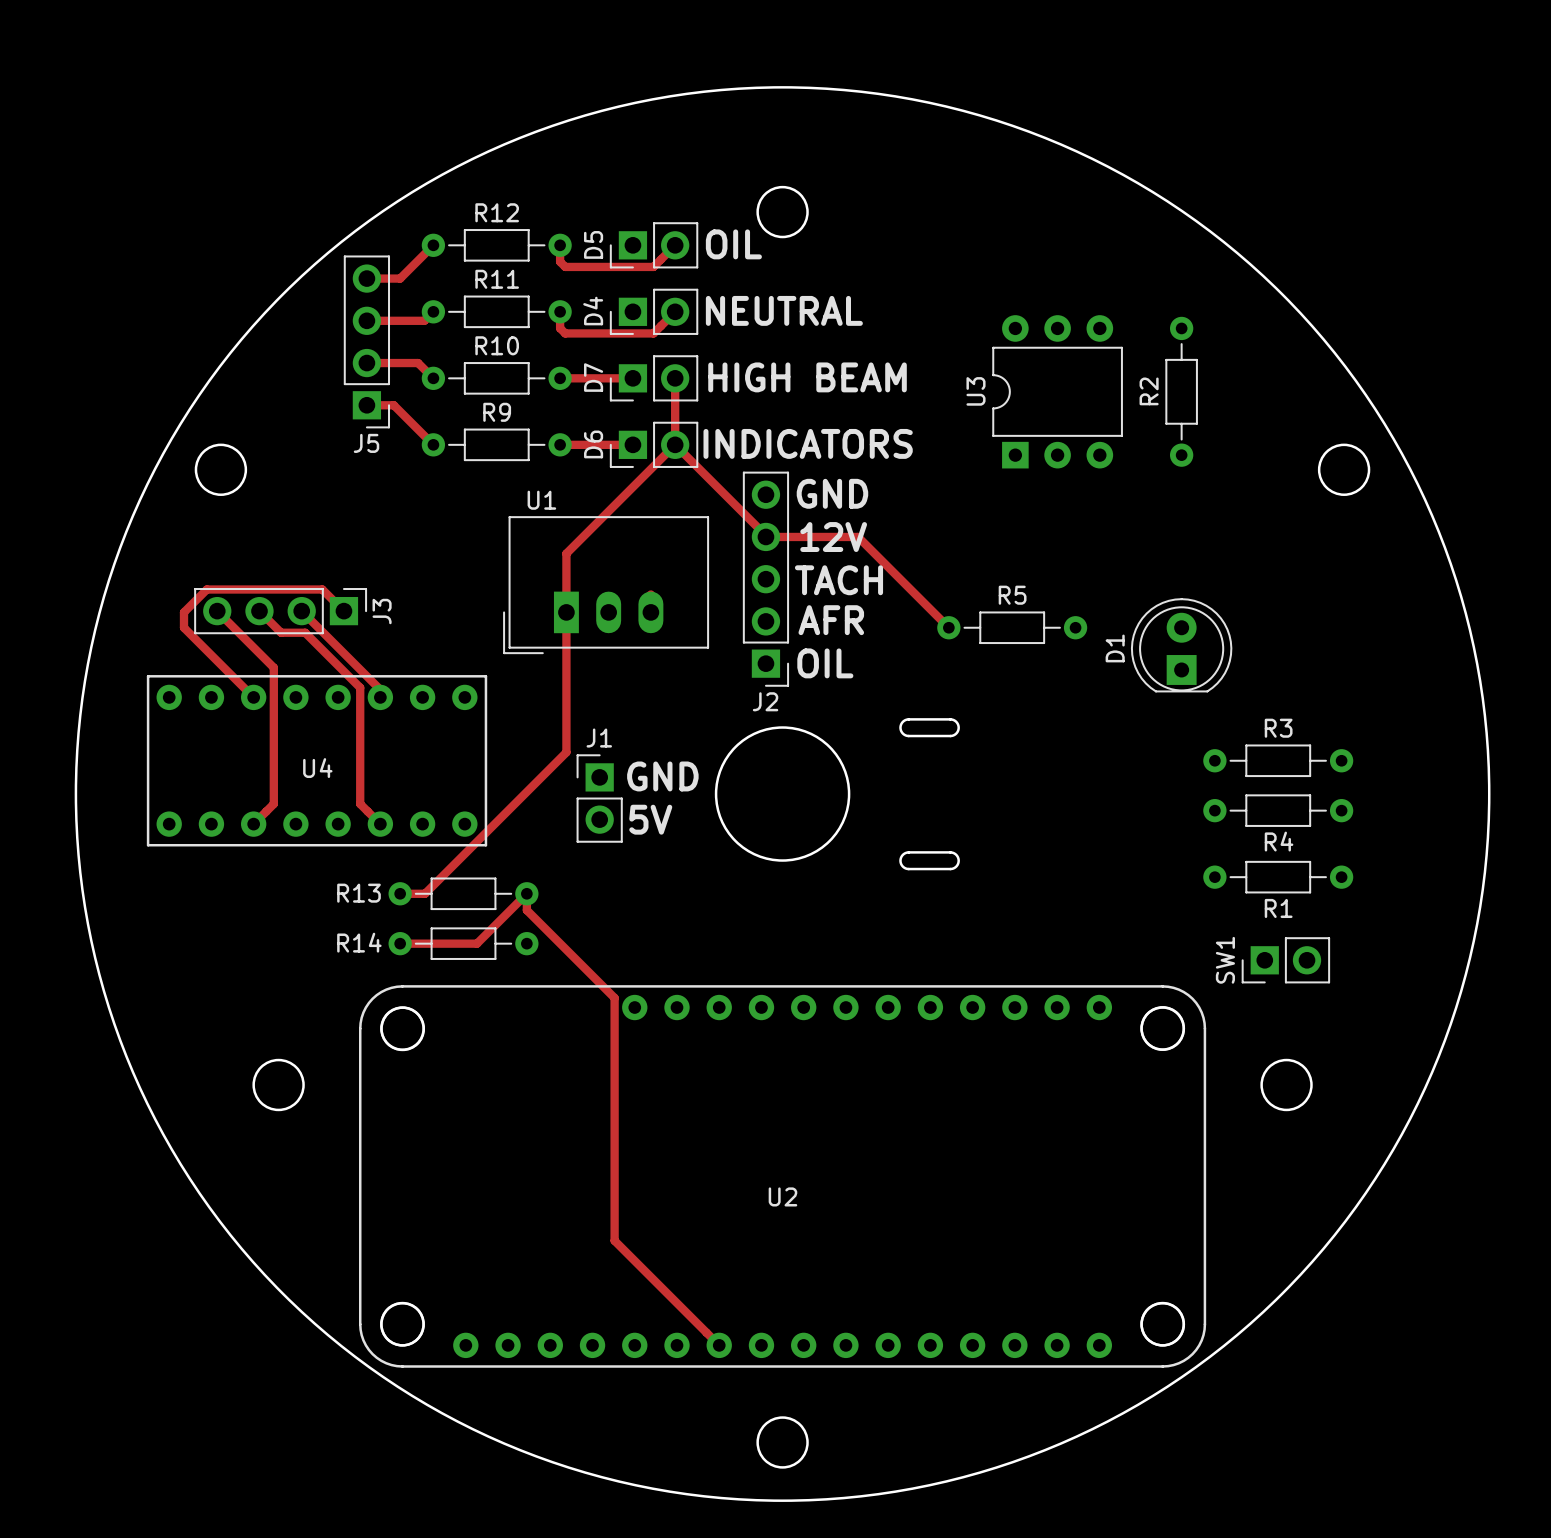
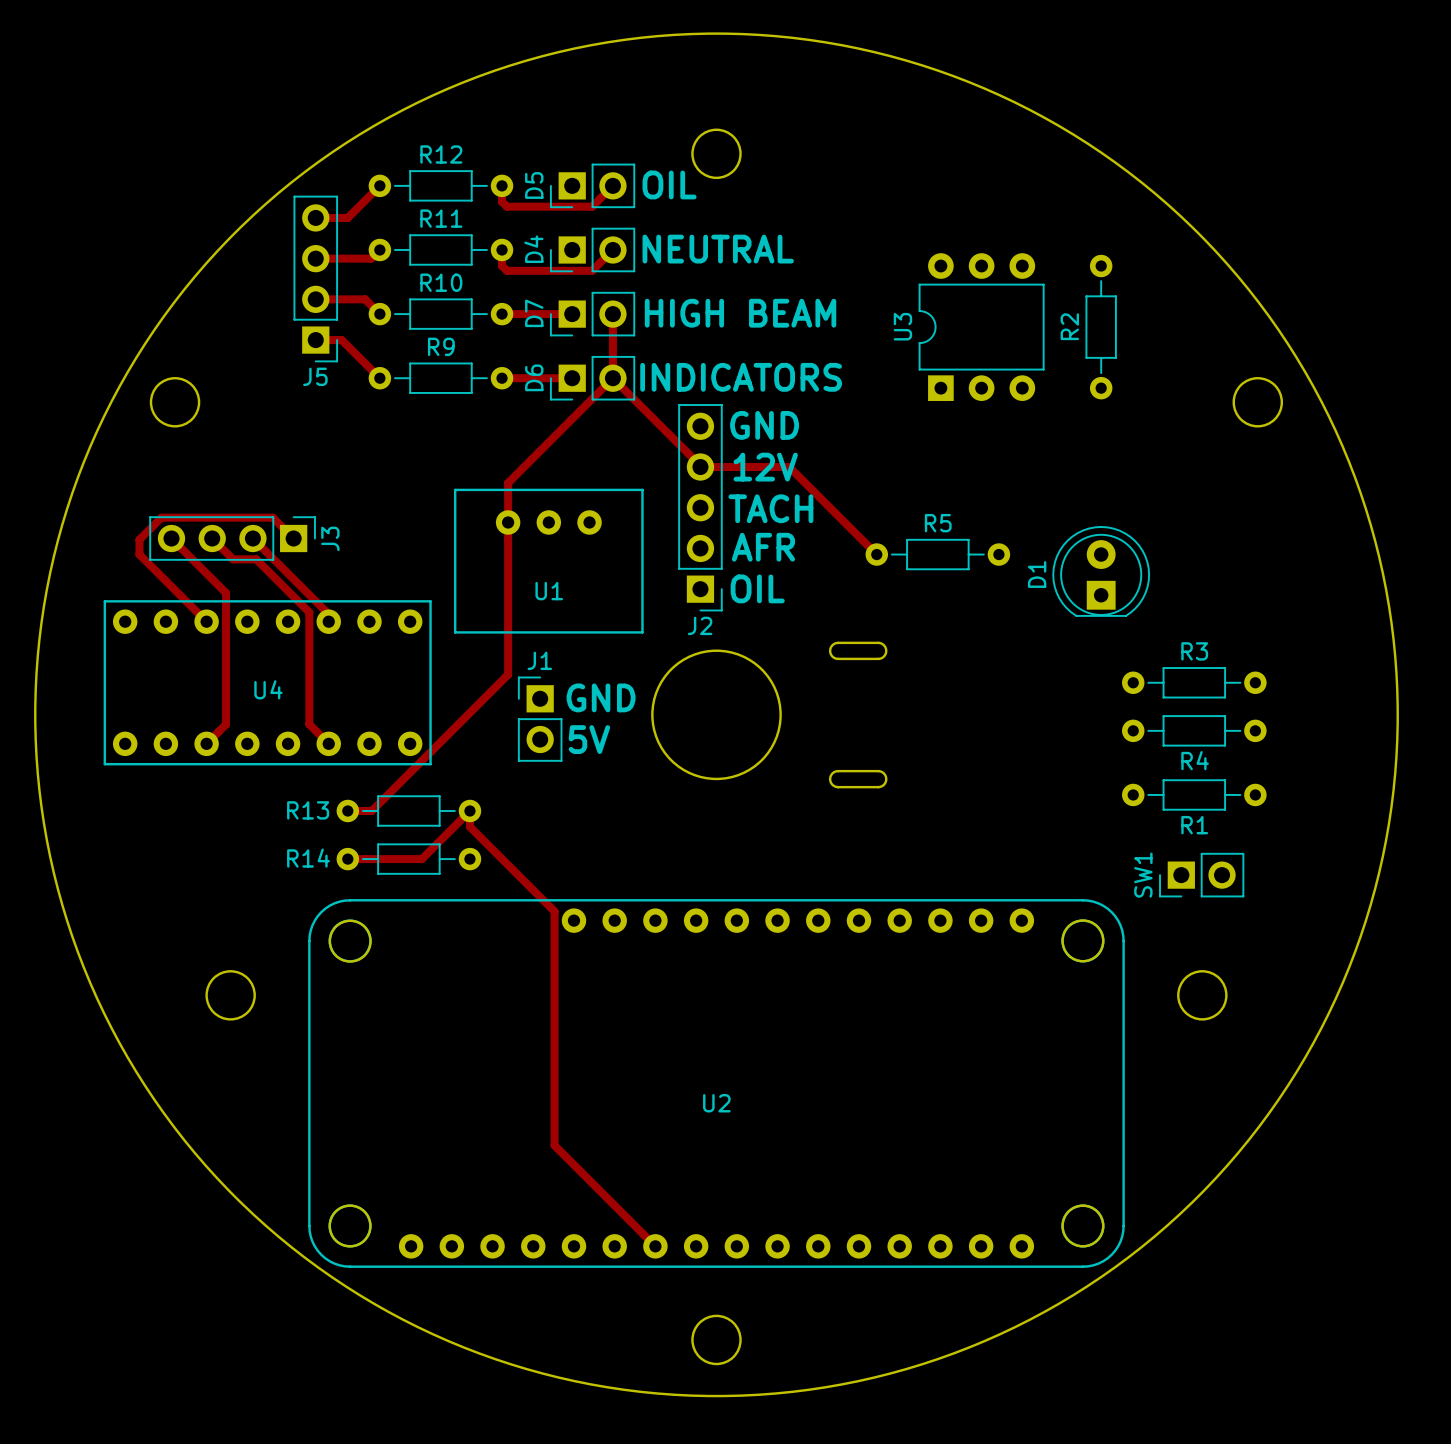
U1 name position: U1 (541, 500) -> U1 (549, 591)
U1 footprint: [503, 516, 710, 655] -> [453, 488, 644, 634]

